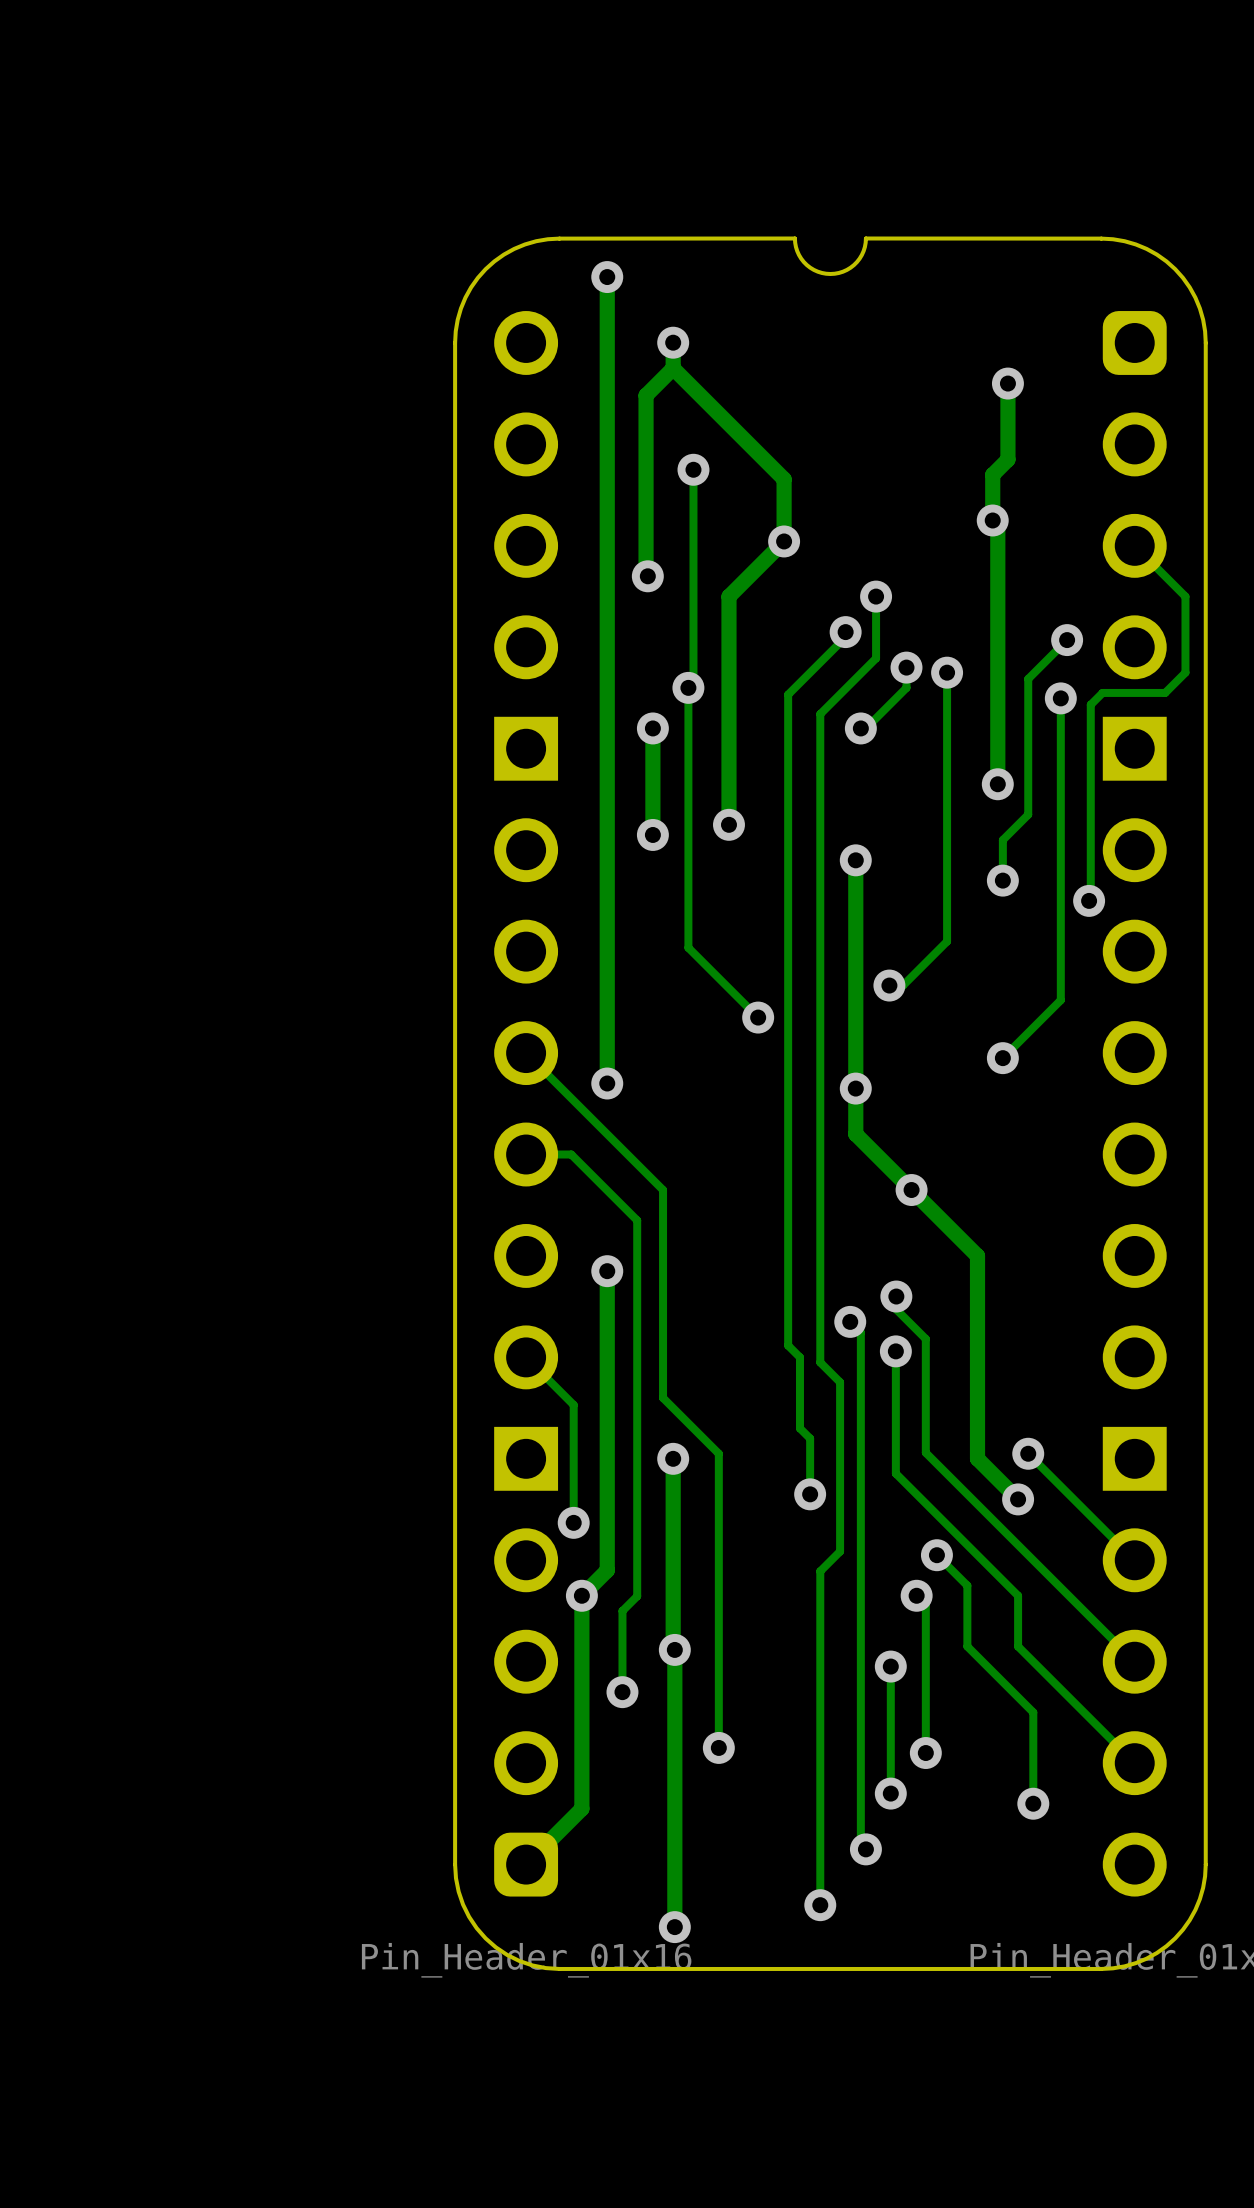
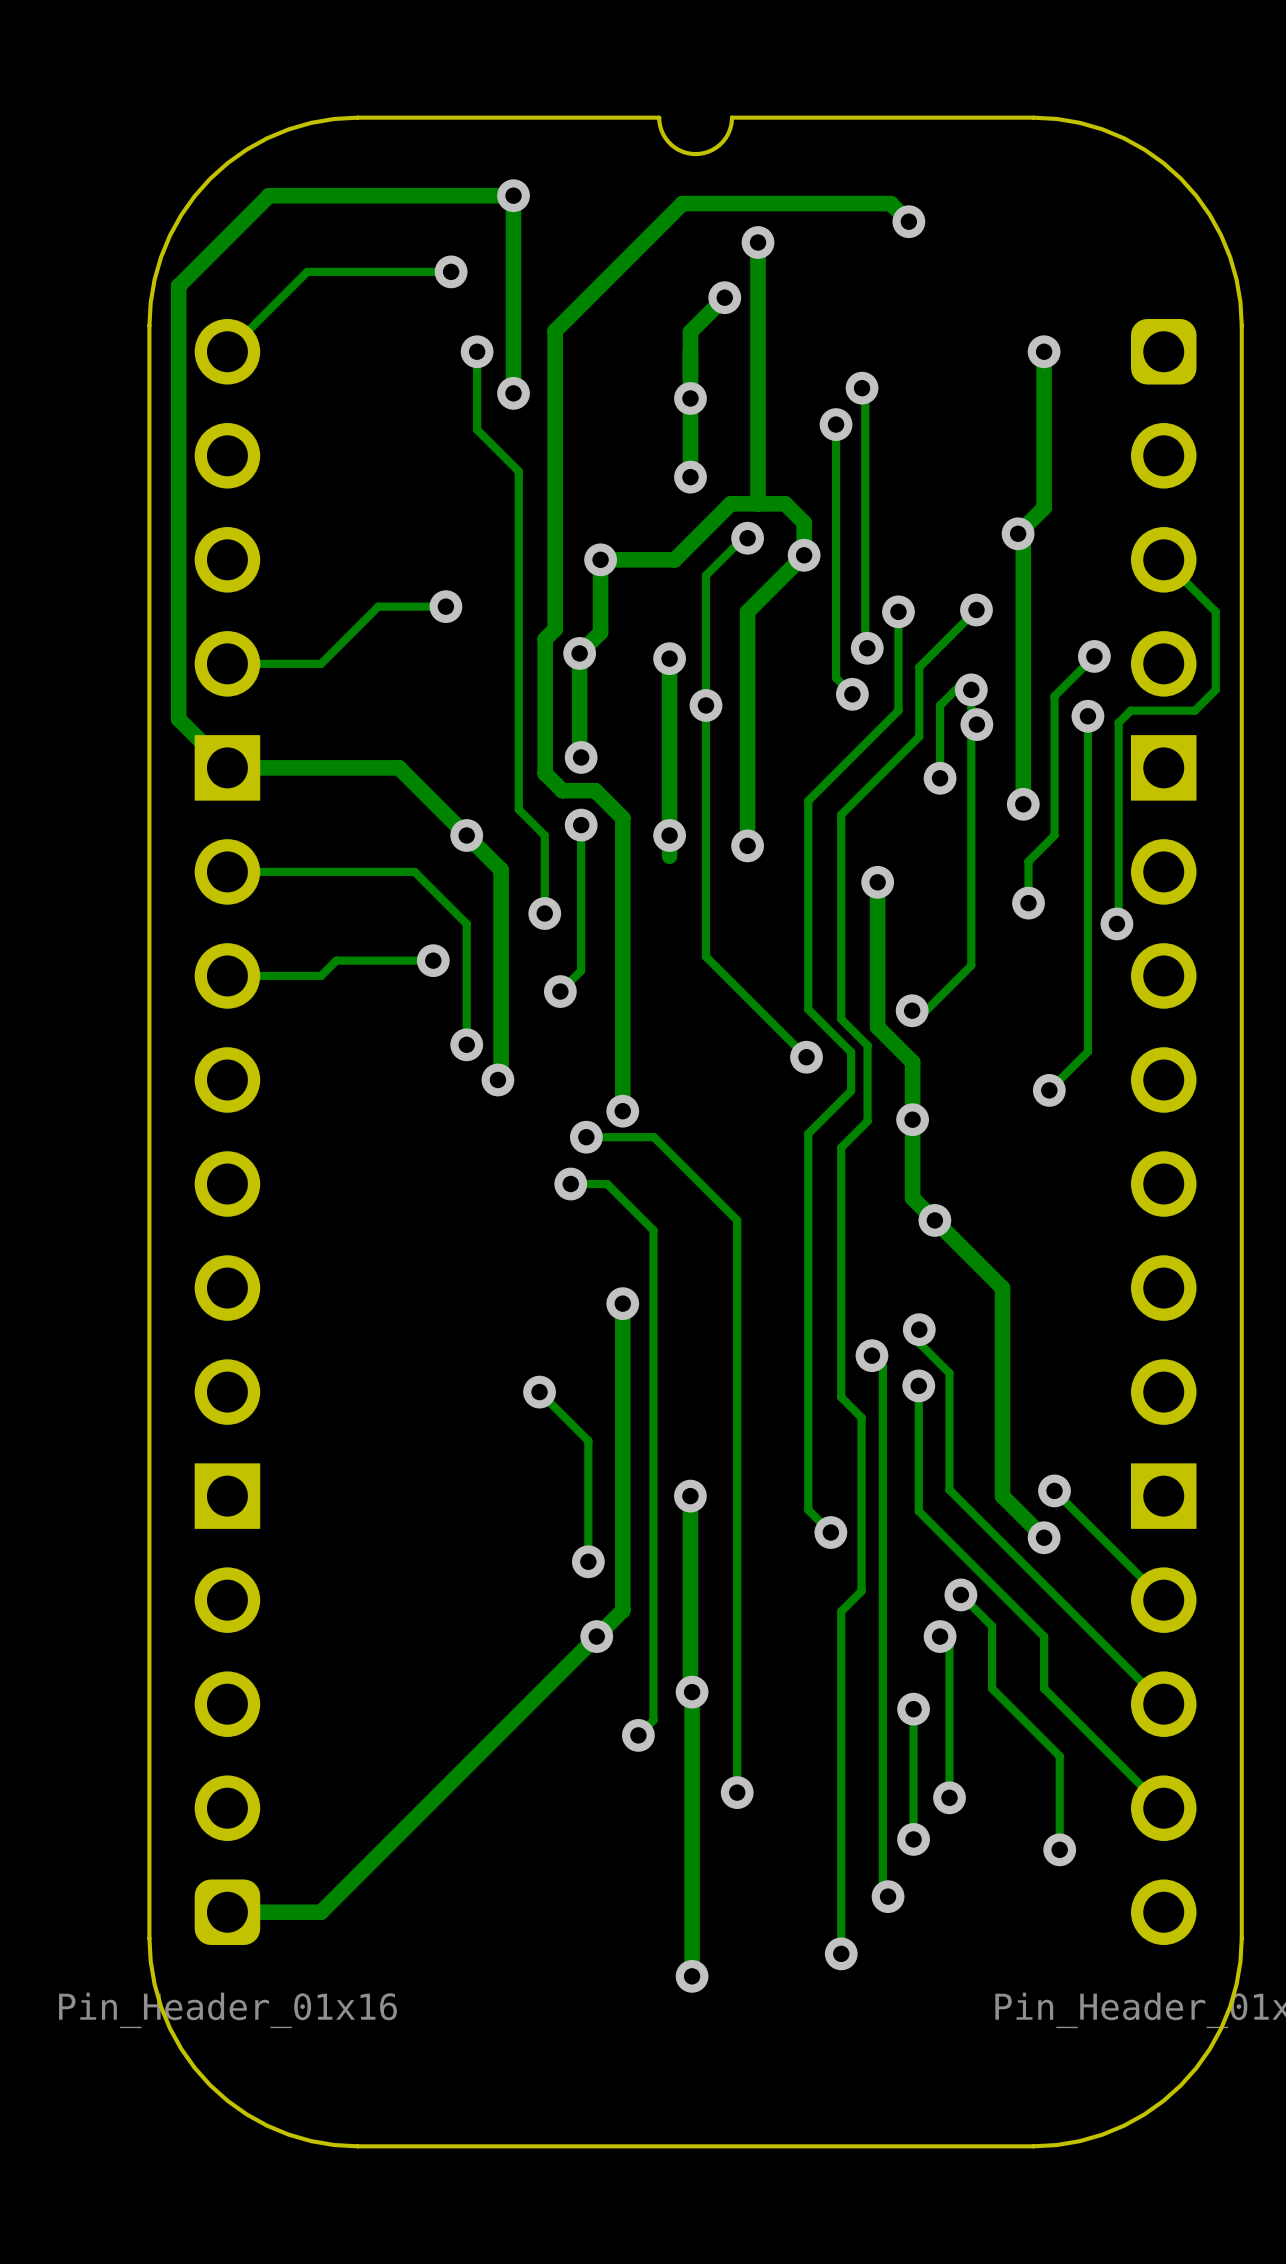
via: none -> (513, 195)
via: none -> (908, 221)
track: none -> (758, 242) (758, 503)
via: none -> (758, 242)
track: none -> (451, 271) (307, 271) (227, 351)
via: none -> (451, 271)
track: (607, 277) (607, 797) -> (908, 221) (890, 203) (682, 203) (555, 330) (555, 629) (545, 639) (545, 773) (562, 790) (595, 790) (622, 818)
via: (607, 277) -> none
track: none -> (724, 297) (690, 331) (690, 477)
via: none -> (724, 297)
track: none -> (477, 351) (477, 429) (518, 471) (518, 809) (544, 835) (544, 913)
via: none -> (477, 351)
via: (673, 342) -> none
track: none -> (862, 388) (865, 391) (865, 653)
via: none -> (862, 388)
track: none -> (513, 393) (513, 195) (269, 195) (178, 286) (178, 719) (227, 767) (399, 767) (501, 869) (501, 1076) (497, 1079)
via: none -> (513, 393)
track: (1007, 383) (1007, 459) (992, 474) (992, 520) -> (1044, 351) (1044, 507) (1018, 533)
via position: (1007, 383) -> (1044, 351)
via: none -> (690, 398)
track: none -> (836, 424) (836, 677) (852, 694)
via: none -> (836, 424)
track: (693, 469) (693, 682) (688, 687) -> (747, 538) (743, 538) (706, 575) (706, 705)
via position: (693, 469) -> (690, 477)
track: (784, 509) (784, 479) (673, 368) (646, 395) (646, 574) (647, 576) -> (804, 522) (785, 503) (730, 503) (674, 559) (600, 559) (600, 632) (579, 653) (579, 755) (581, 757)
via: none -> (747, 538)
via: none -> (600, 559)
via: (647, 576) -> none
track: none -> (445, 606) (378, 606) (321, 663) (227, 663)
via: none -> (445, 606)
track: none -> (976, 609) (919, 667) (919, 736) (841, 814)
via: none -> (976, 609)
track: (845, 632) (840, 637) (840, 642) (788, 694) (788, 780) -> none
via: none -> (579, 653)
track: none -> (669, 658) (669, 747)
via: none -> (669, 658)
track: (876, 658) (820, 714) (820, 794) -> (898, 675) (898, 710) (808, 800)
track: (906, 667) (906, 687) (865, 728) (860, 728) -> none
via: (906, 667) -> none
track: none -> (960, 684) (940, 705) (940, 778)
via: none -> (852, 694)
via: none -> (976, 724)
via: (652, 728) -> none
via: (860, 728) -> none
via: none -> (581, 757)
via: none -> (940, 778)
track: none -> (581, 825) (581, 970) (560, 991)
via: none -> (581, 825)
via: none -> (466, 835)
via position: (652, 834) -> (669, 835)
track: none -> (227, 871) (414, 871) (466, 923) (466, 1044)
via: none -> (544, 913)
track: (688, 932) (688, 947) (758, 1017) -> (706, 956) (806, 1057)
track: none -> (433, 960) (336, 960) (321, 975) (227, 975)
via: none -> (433, 960)
via: none -> (560, 991)
track: (788, 984) (788, 1105) -> (808, 1009) (851, 1052) (851, 1090) (808, 1133)
track: (820, 993) (820, 1119) -> (841, 1019) (867, 1045) (867, 1121) (841, 1147)
track: (1060, 1000) (1002, 1058) -> (1087, 1025) (1087, 1051) (1049, 1090)
track: (855, 1001) (855, 1134) (889, 1168) -> (877, 1027) (912, 1062) (912, 1198)
via position: (758, 1017) -> (806, 1057)
via: none -> (466, 1044)
via: none -> (497, 1079)
track: (526, 1053) (663, 1190) (663, 1397) (718, 1453) -> (586, 1137) (653, 1137) (737, 1220) (737, 1490)
via position: (1002, 1058) -> (1049, 1090)
via position: (855, 1088) -> (912, 1119)
part: none -> (695, 1132)
part: (830, 1103) -> none
via: none -> (586, 1137)
via: none -> (570, 1184)
track: (571, 1154) (637, 1220) -> (585, 1184) (607, 1184) (653, 1230) (653, 1251)
track: (788, 1345) (799, 1357) (799, 1428) (810, 1438) (810, 1494) -> (808, 1379) (808, 1509) (830, 1532)
via: none -> (539, 1392)
track: (581, 1595) (581, 1808) (526, 1864) -> (596, 1636) (321, 1912) (227, 1912)
track: (637, 1596) (622, 1610) (622, 1692) -> (653, 1637) (653, 1720) (638, 1735)
drawing position: (526, 1960) -> (228, 2010)

